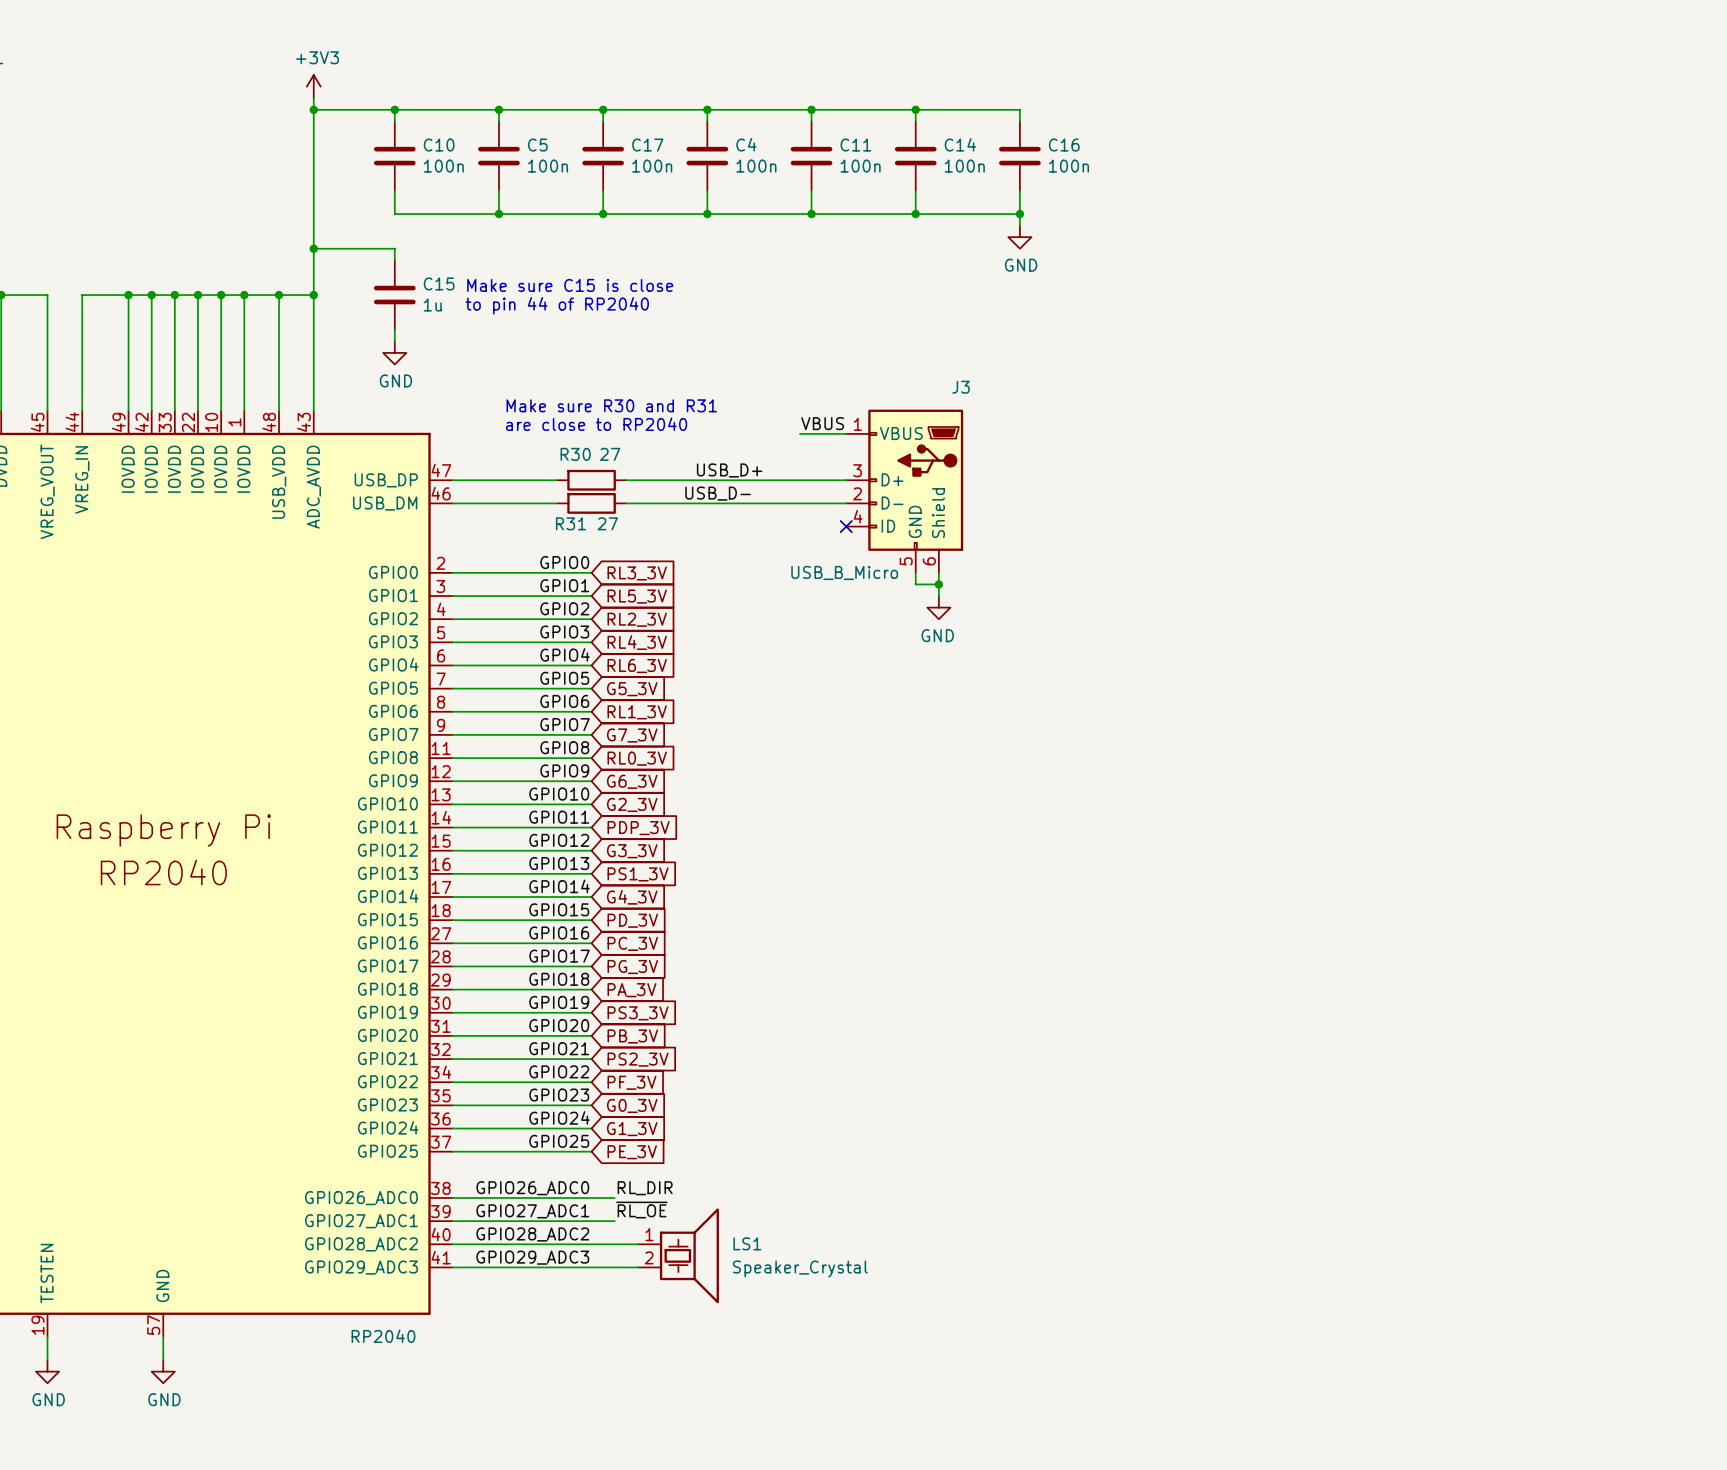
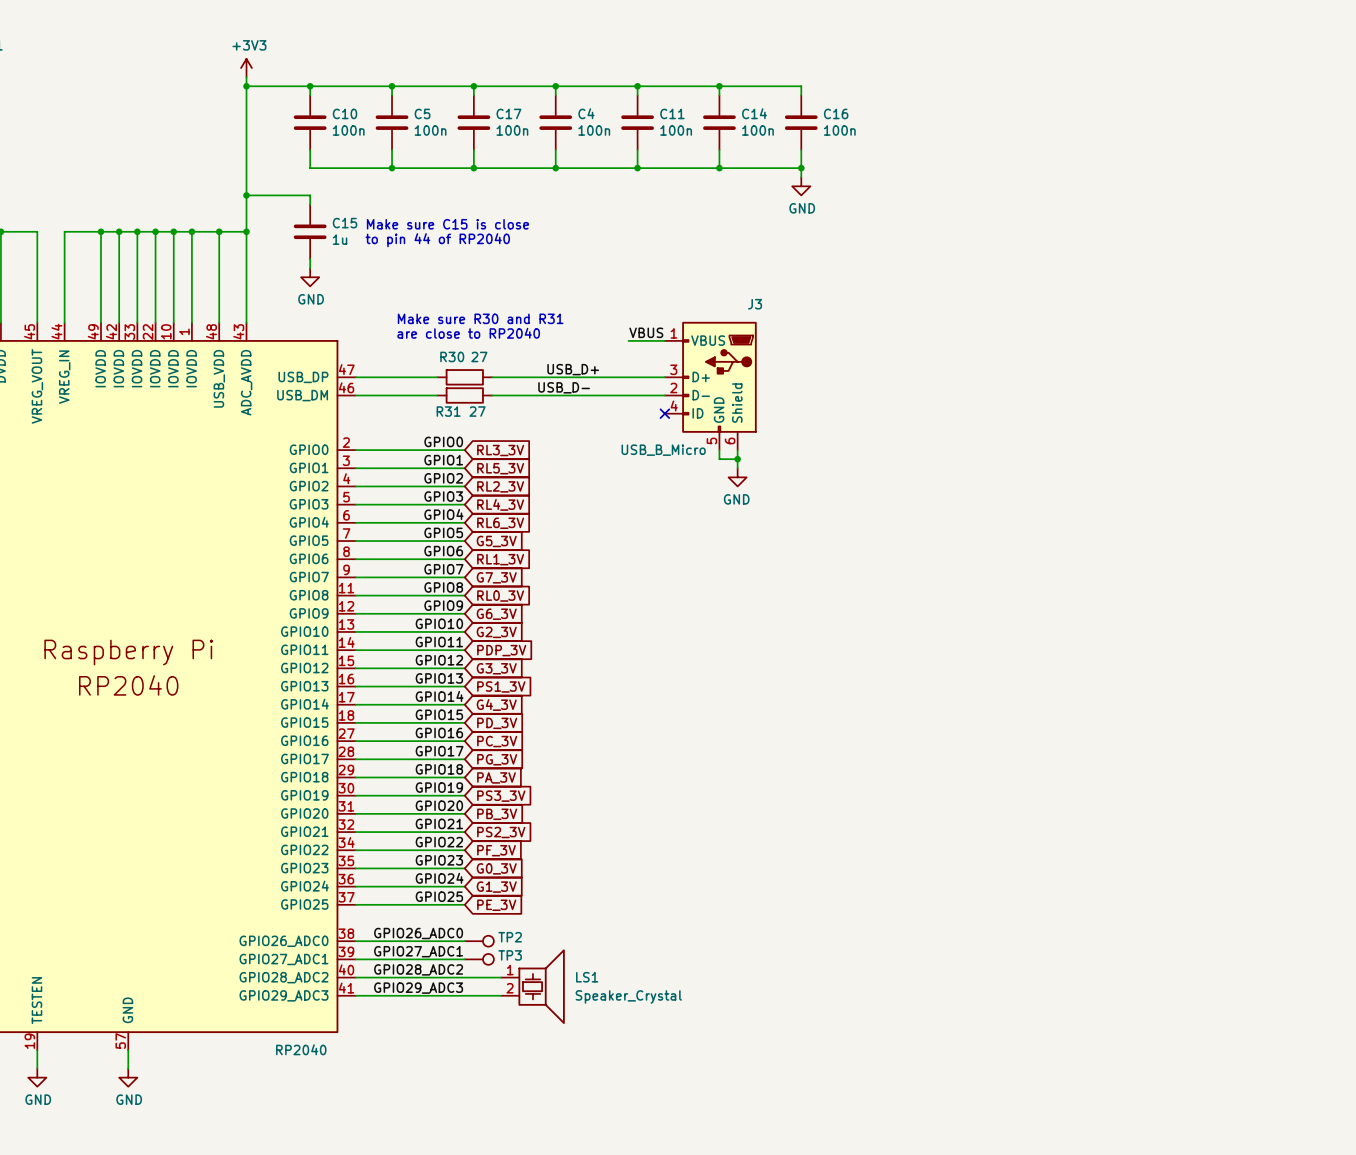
label: RL_DIR (645, 1188) -> none
TP2: none -> (479, 941)
label: ~{RL_OE} (641, 1210) -> none
TP3: none -> (479, 959)

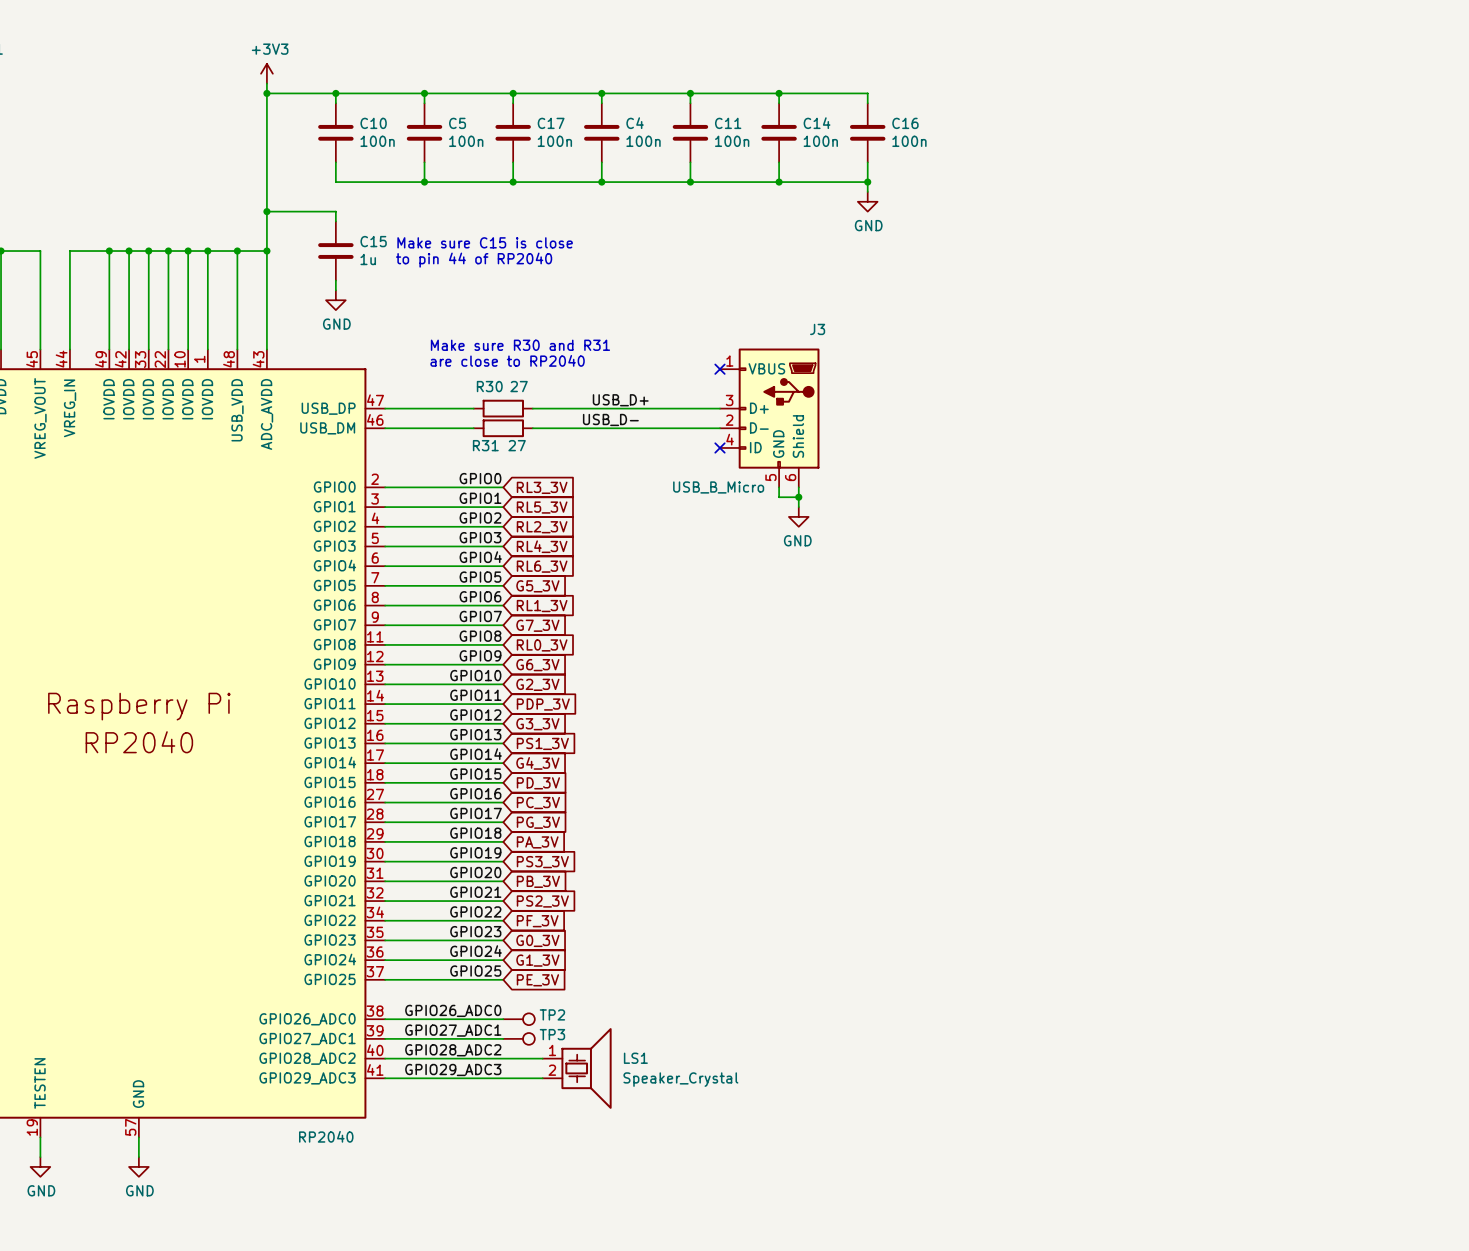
label: VBUS (646, 332) -> none
wire: (628, 340) (664, 340) -> none
no-connect mark: none -> (719, 369)

